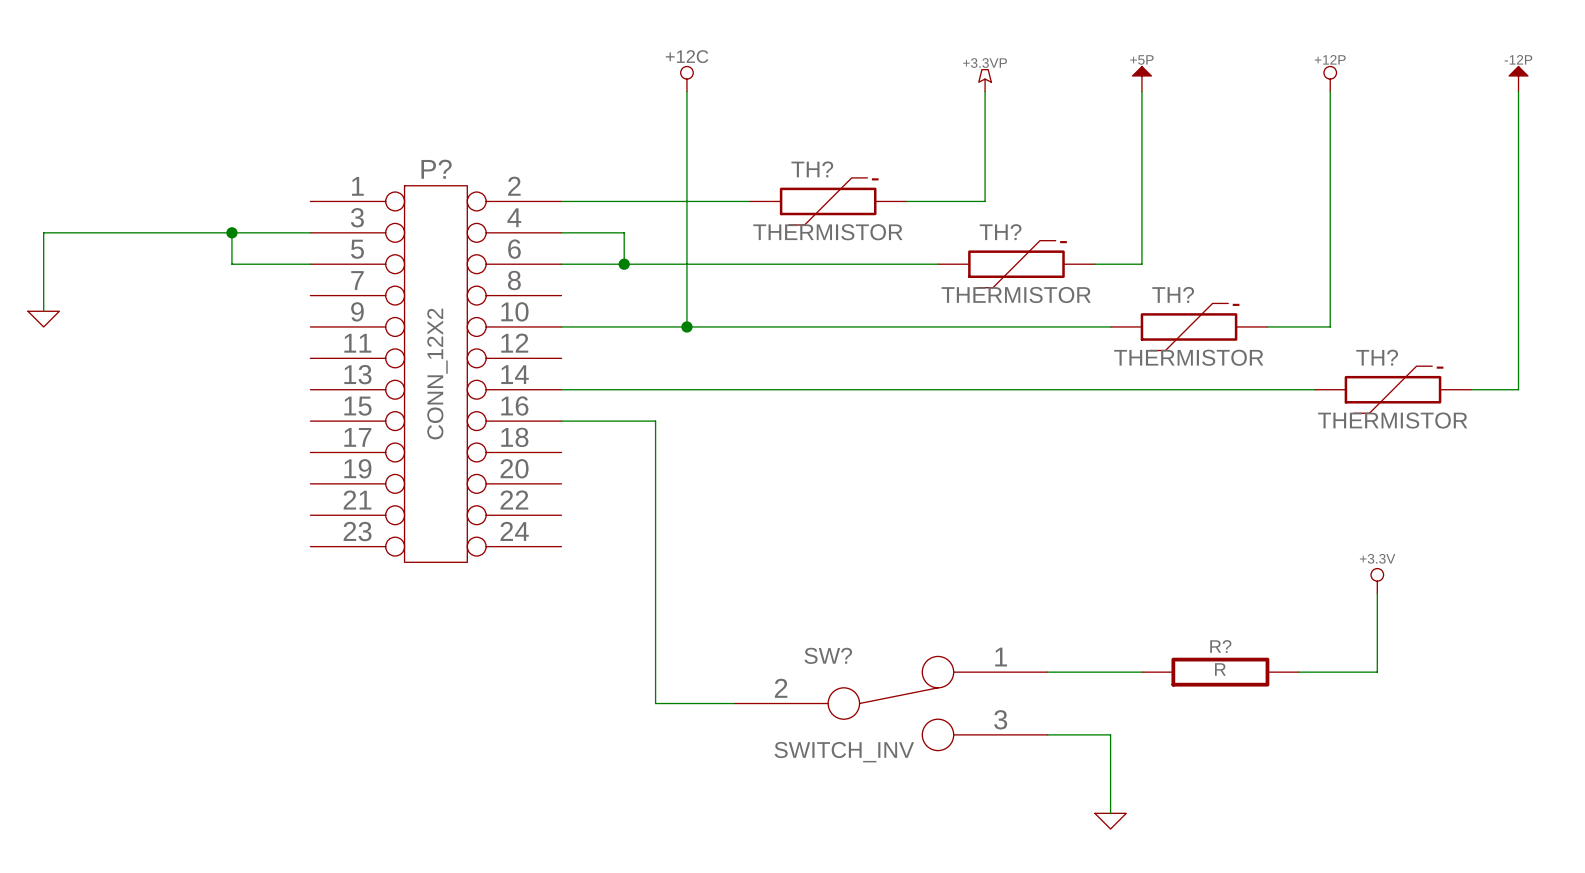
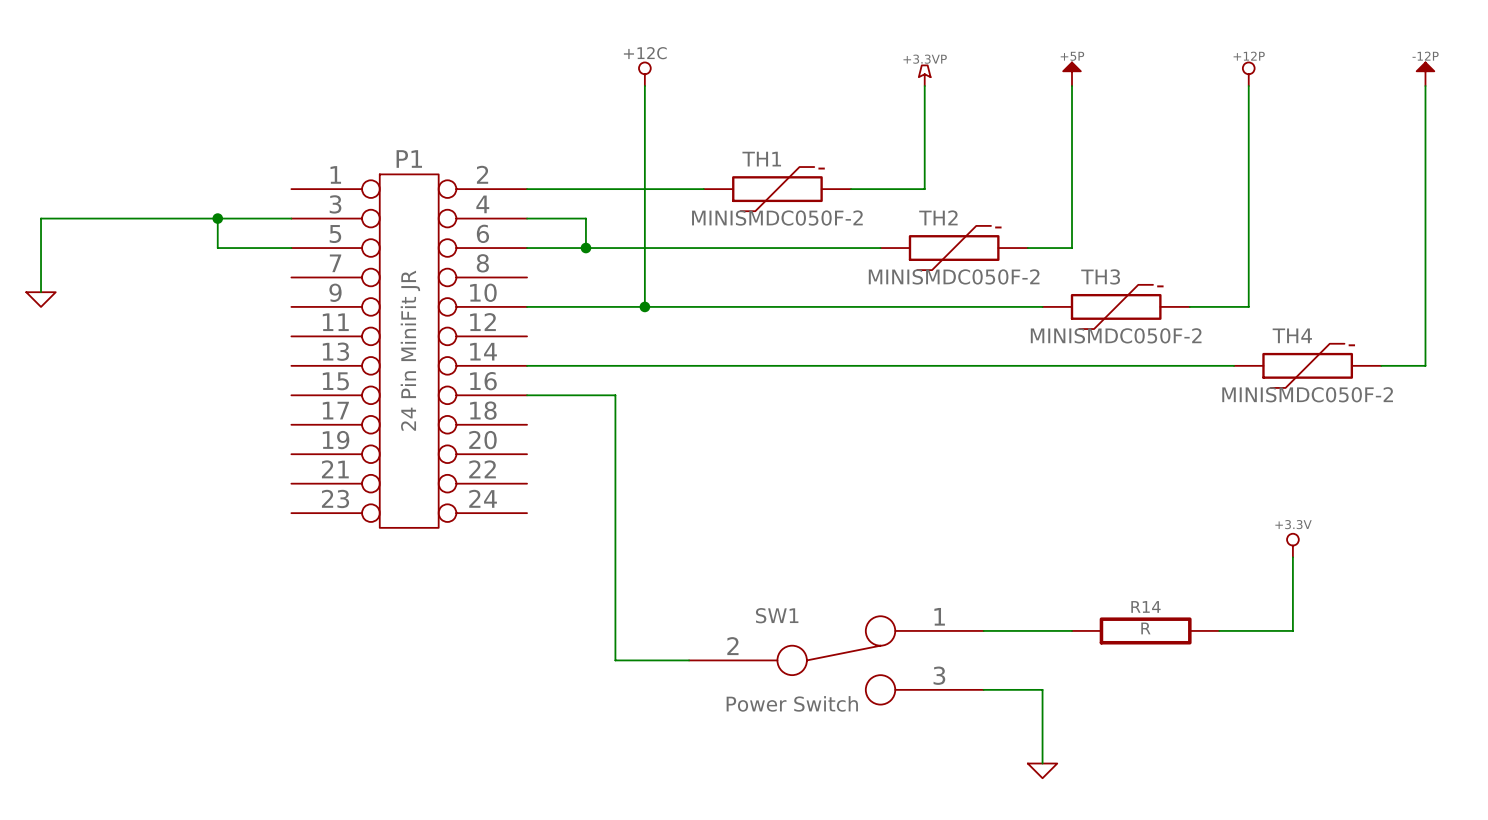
P? name: P? (436, 169) -> P1 (409, 158)
TH? name: TH? (812, 169) -> TH1 (761, 159)
TH? value: THERMISTOR (827, 232) -> MINISMDC050F-2 (777, 218)
TH? name: TH? (1000, 232) -> TH2 (938, 217)
TH? name: TH? (1173, 294) -> TH3 (1100, 276)
TH? value: THERMISTOR (1016, 295) -> MINISMDC050F-2 (954, 276)
TH? value: THERMISTOR (1188, 357) -> MINISMDC050F-2 (1116, 335)
TH? name: TH? (1377, 357) -> TH4 (1292, 335)
P? value: CONN_12X2 (437, 374) -> 24 Pin MiniFit JR (410, 350)
TH? value: THERMISTOR (1392, 420) -> MINISMDC050F-2 (1307, 394)
R? name: R? (1220, 646) -> R14 (1145, 606)
SW? name: SW? (828, 655) -> SW1 (777, 615)
SW? value: SWITCH_INV (844, 752) -> Power Switch (792, 703)

